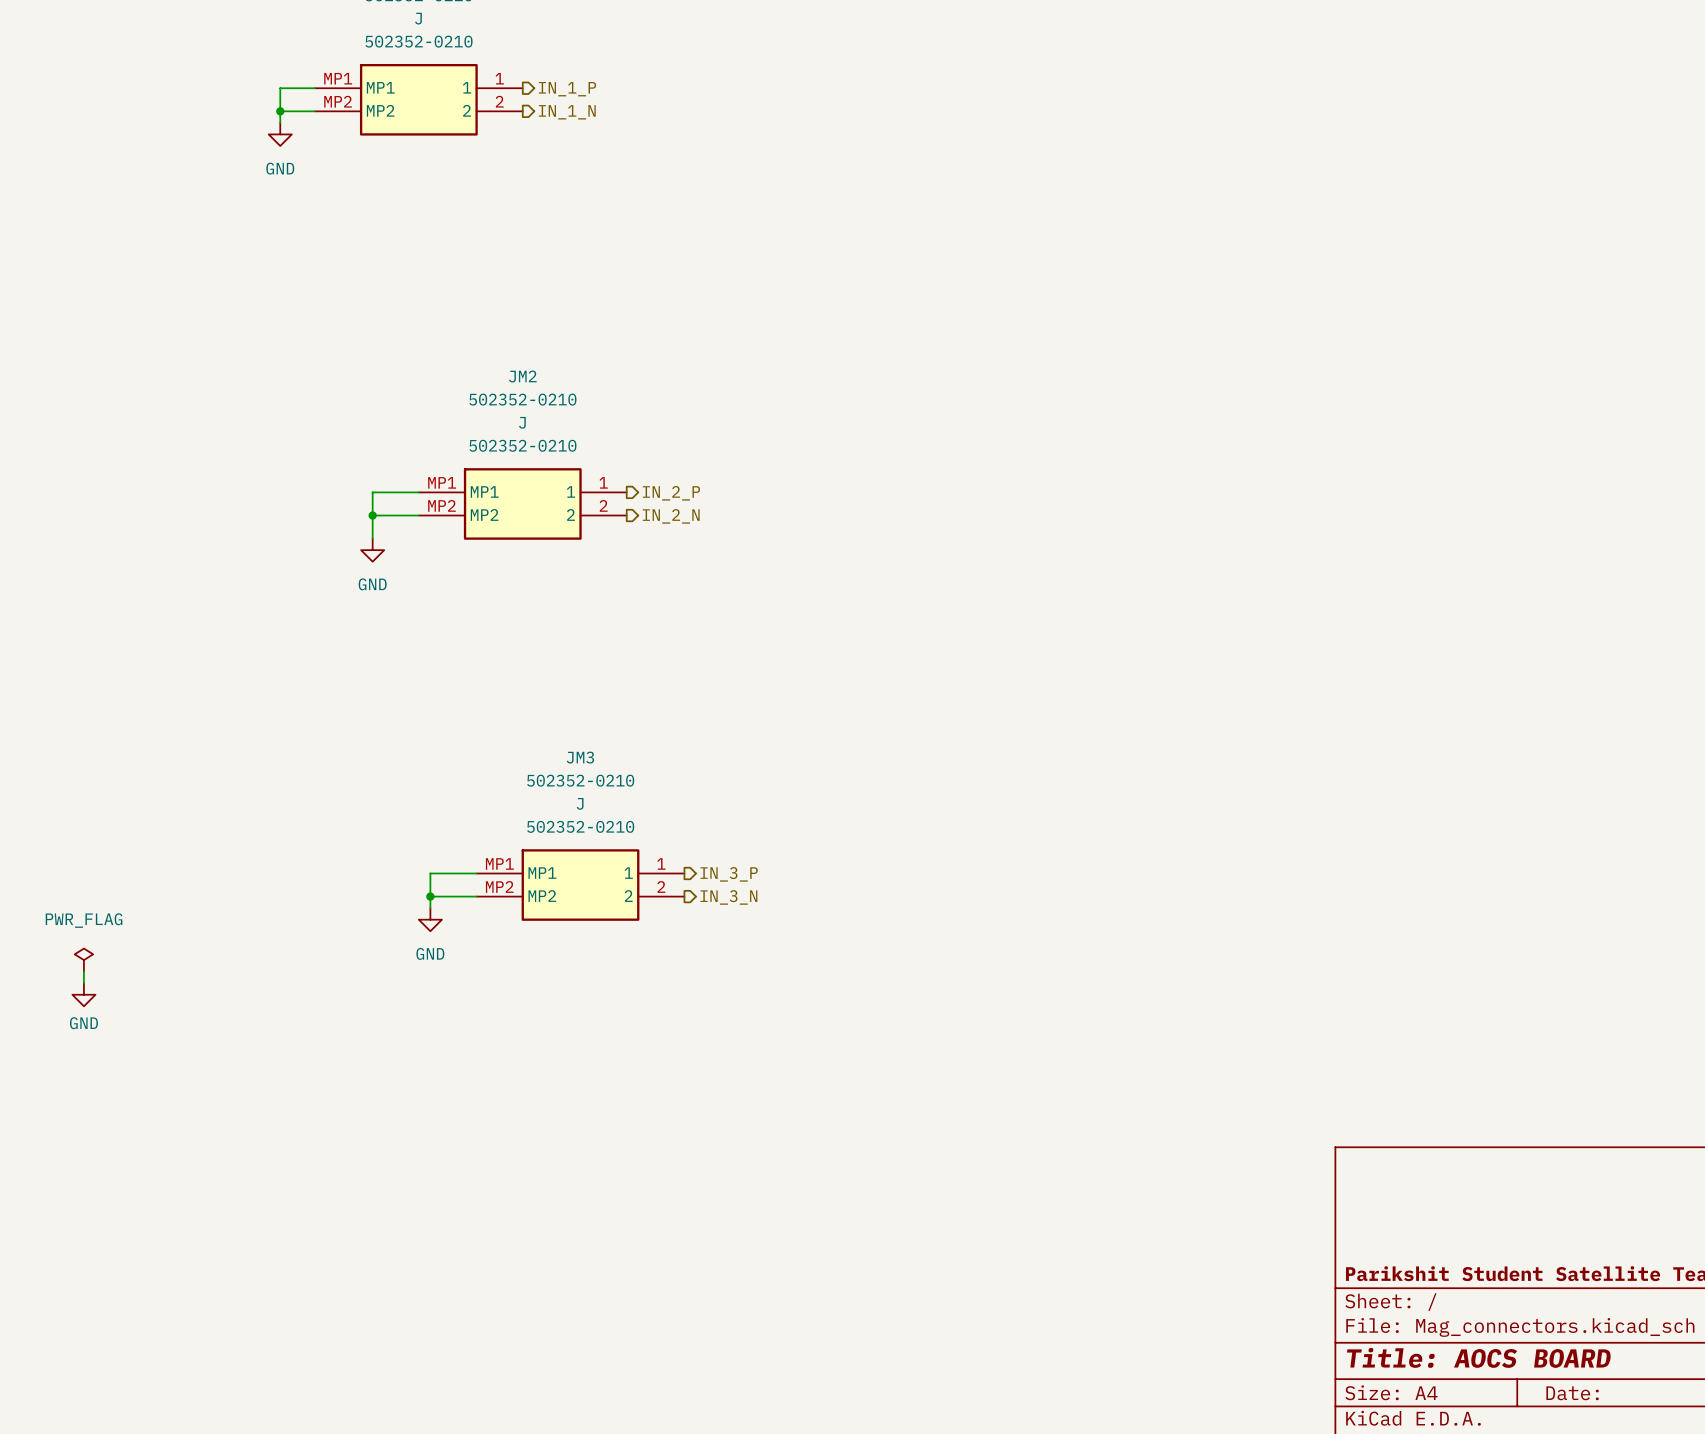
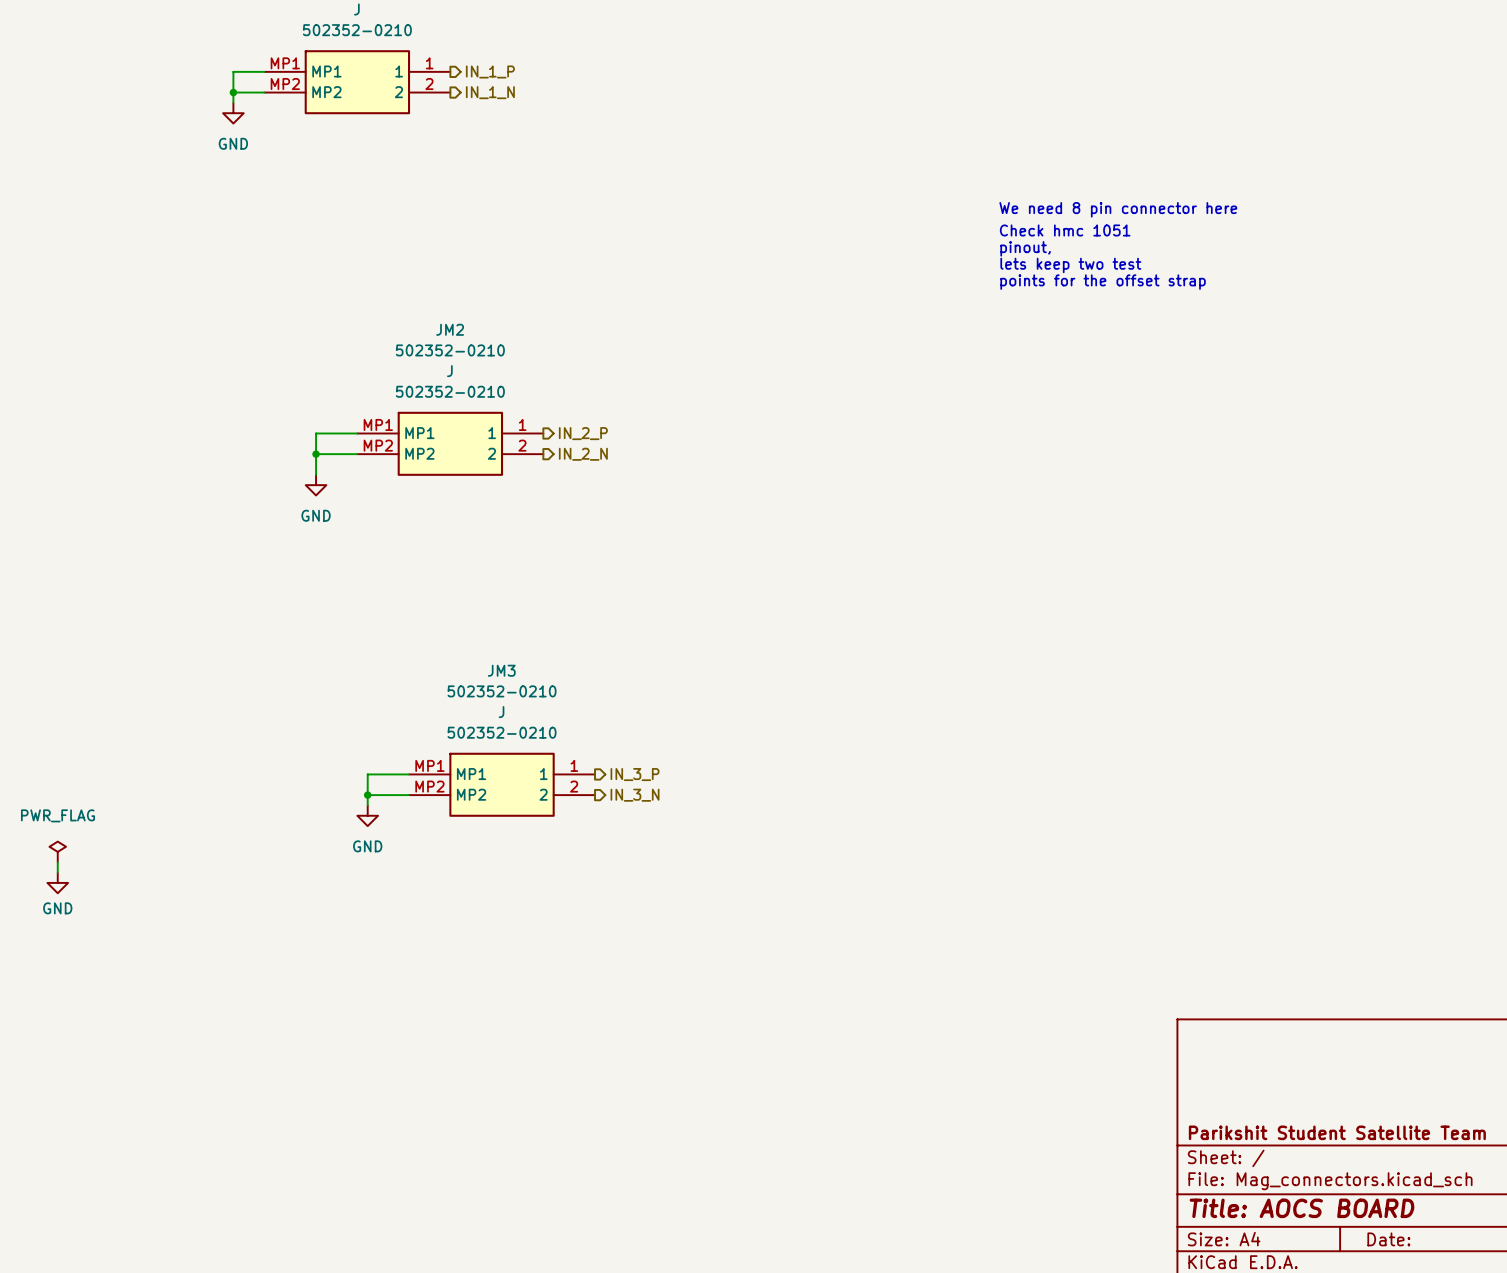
text: none -> We need 8 pin connector here (1118, 209)
text: none -> Check hmc 1051 (1065, 230)
text: none -> pinout, (1025, 248)
text: none -> lets keep two test (1070, 265)
text: none -> points for the offset strap (1103, 282)

